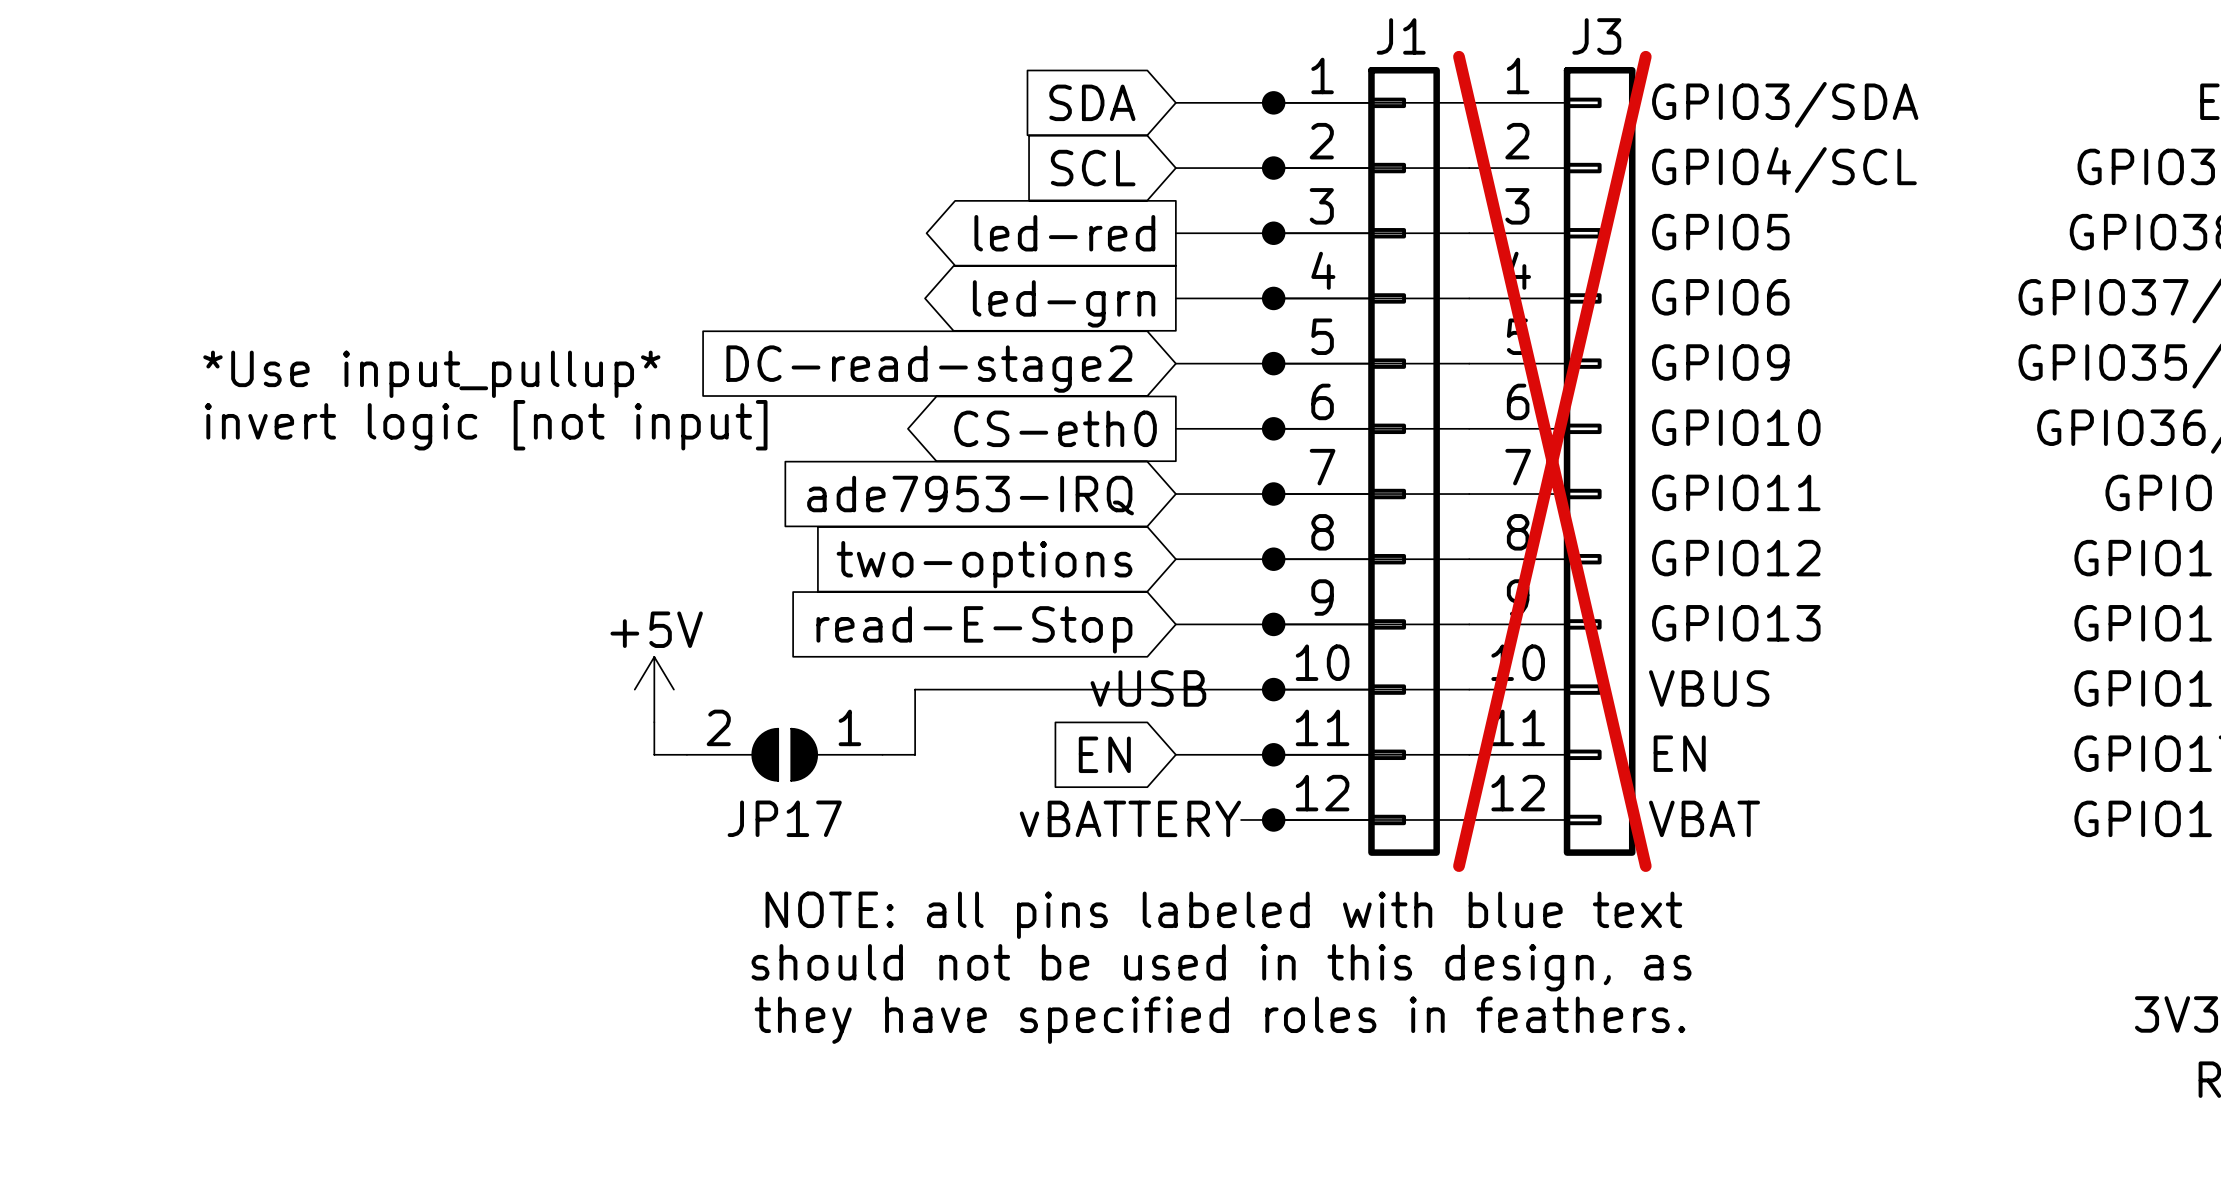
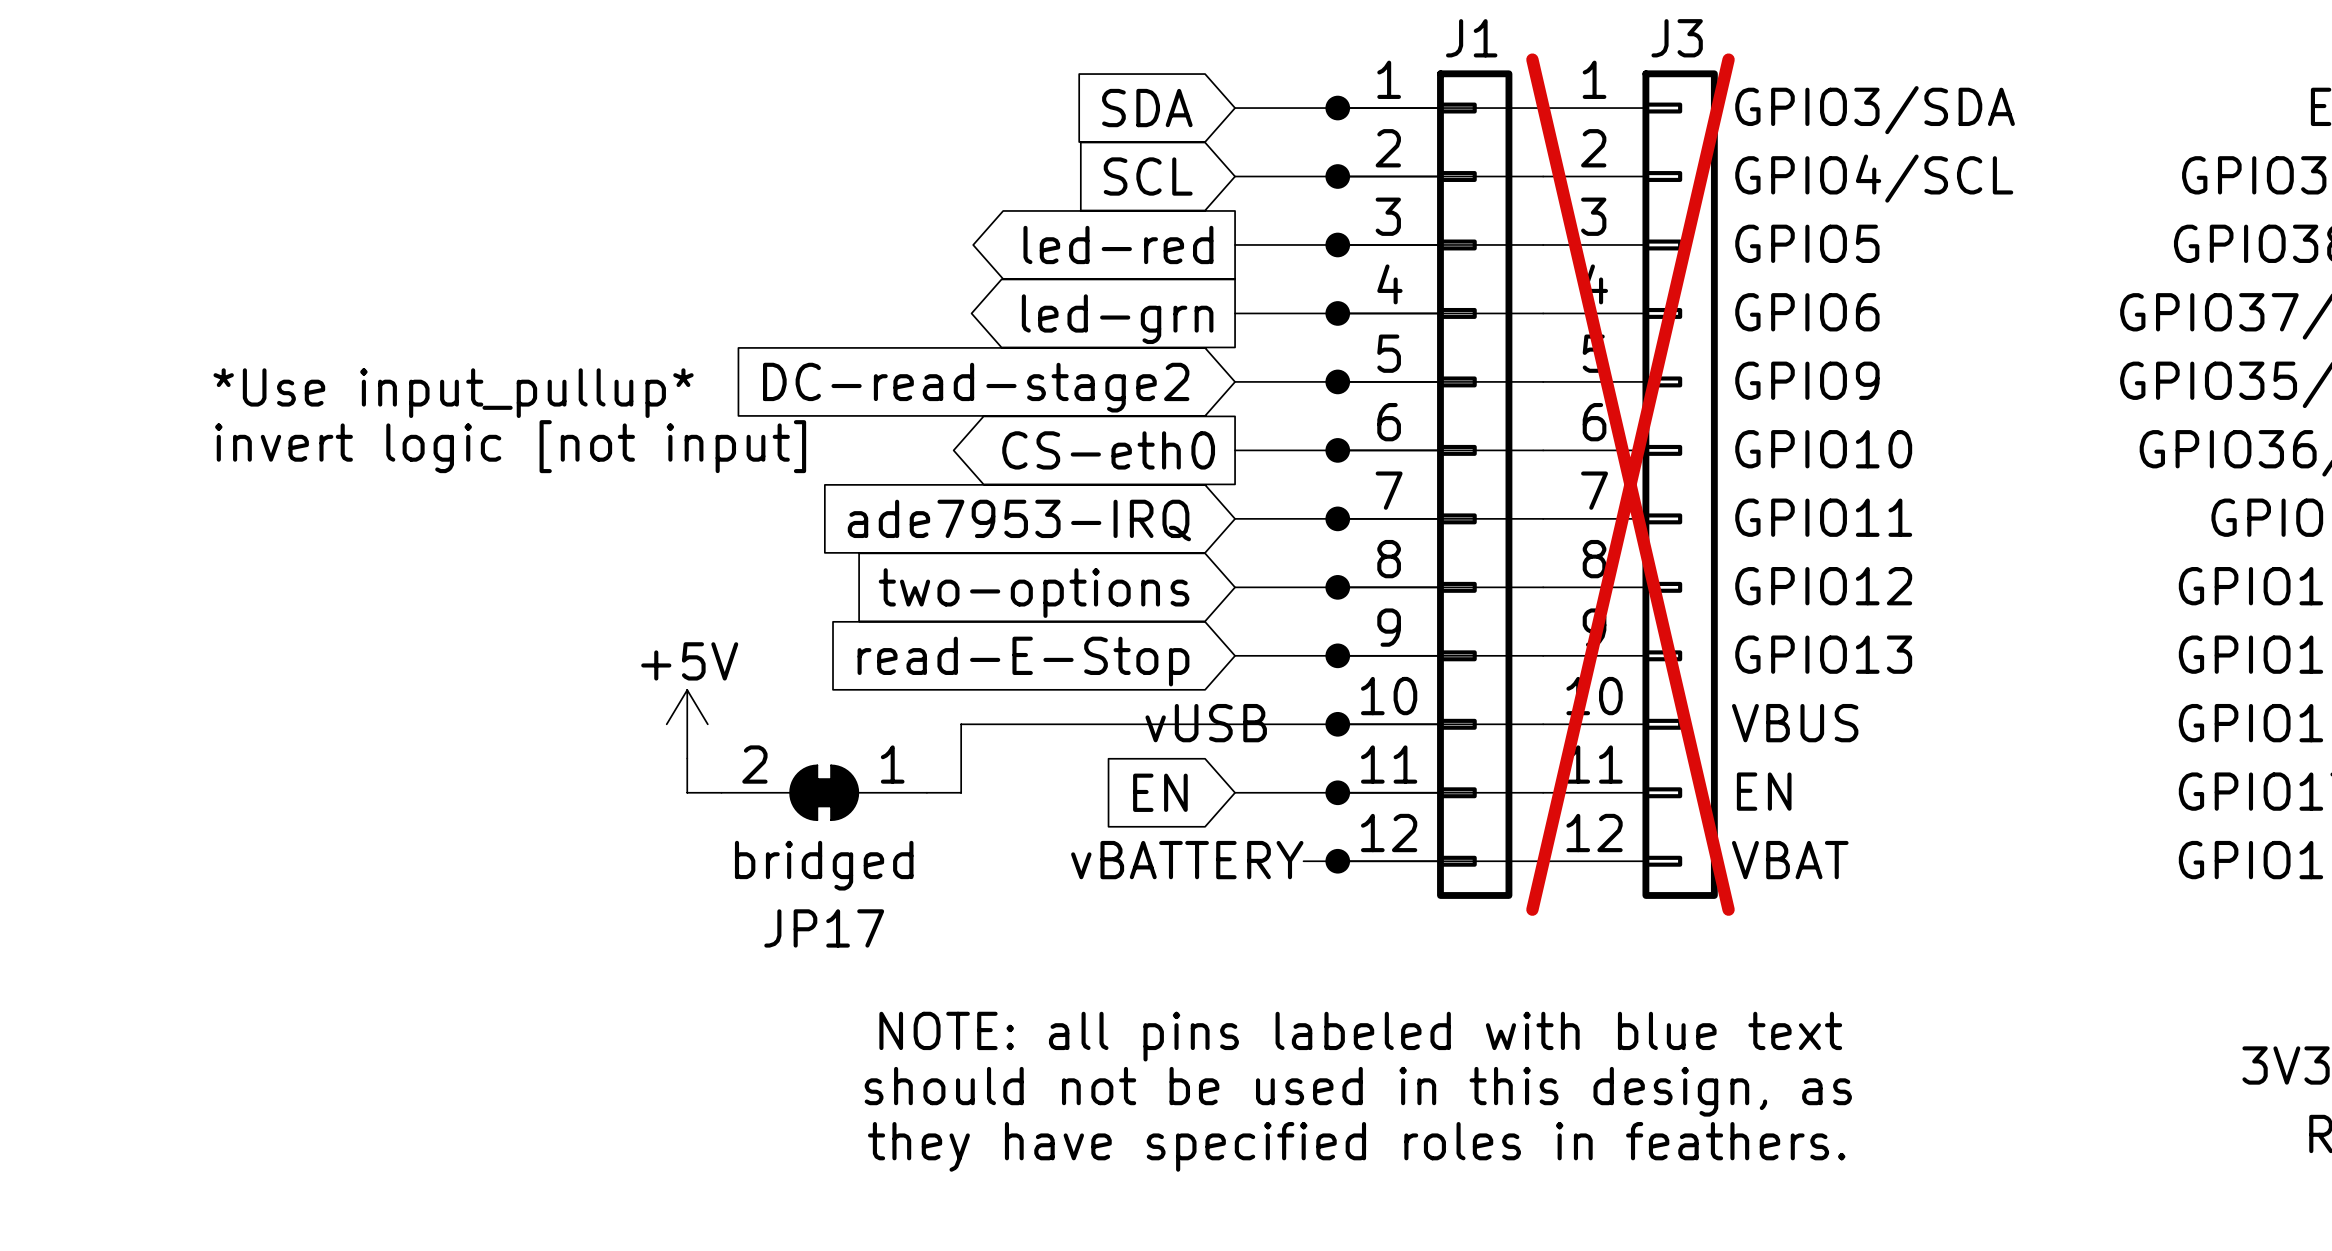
JP17 symbol: [686, 728, 883, 781] -> [721, 765, 927, 821]
JP17 name position: JP17 (784, 818) -> JP17 (824, 928)
JP17 value: none -> bridged (824, 865)
text position: NOTE: all pins labeled with blue text (1223, 915) -> NOTE: all pins labeled with blue text (1360, 1036)
text position: should not be used in this design, as (1221, 967) -> should not be used in this design, as (1358, 1091)
text position: they have specified roles in feathers. (1219, 1020) -> they have specified roles in feathers. (1356, 1146)

